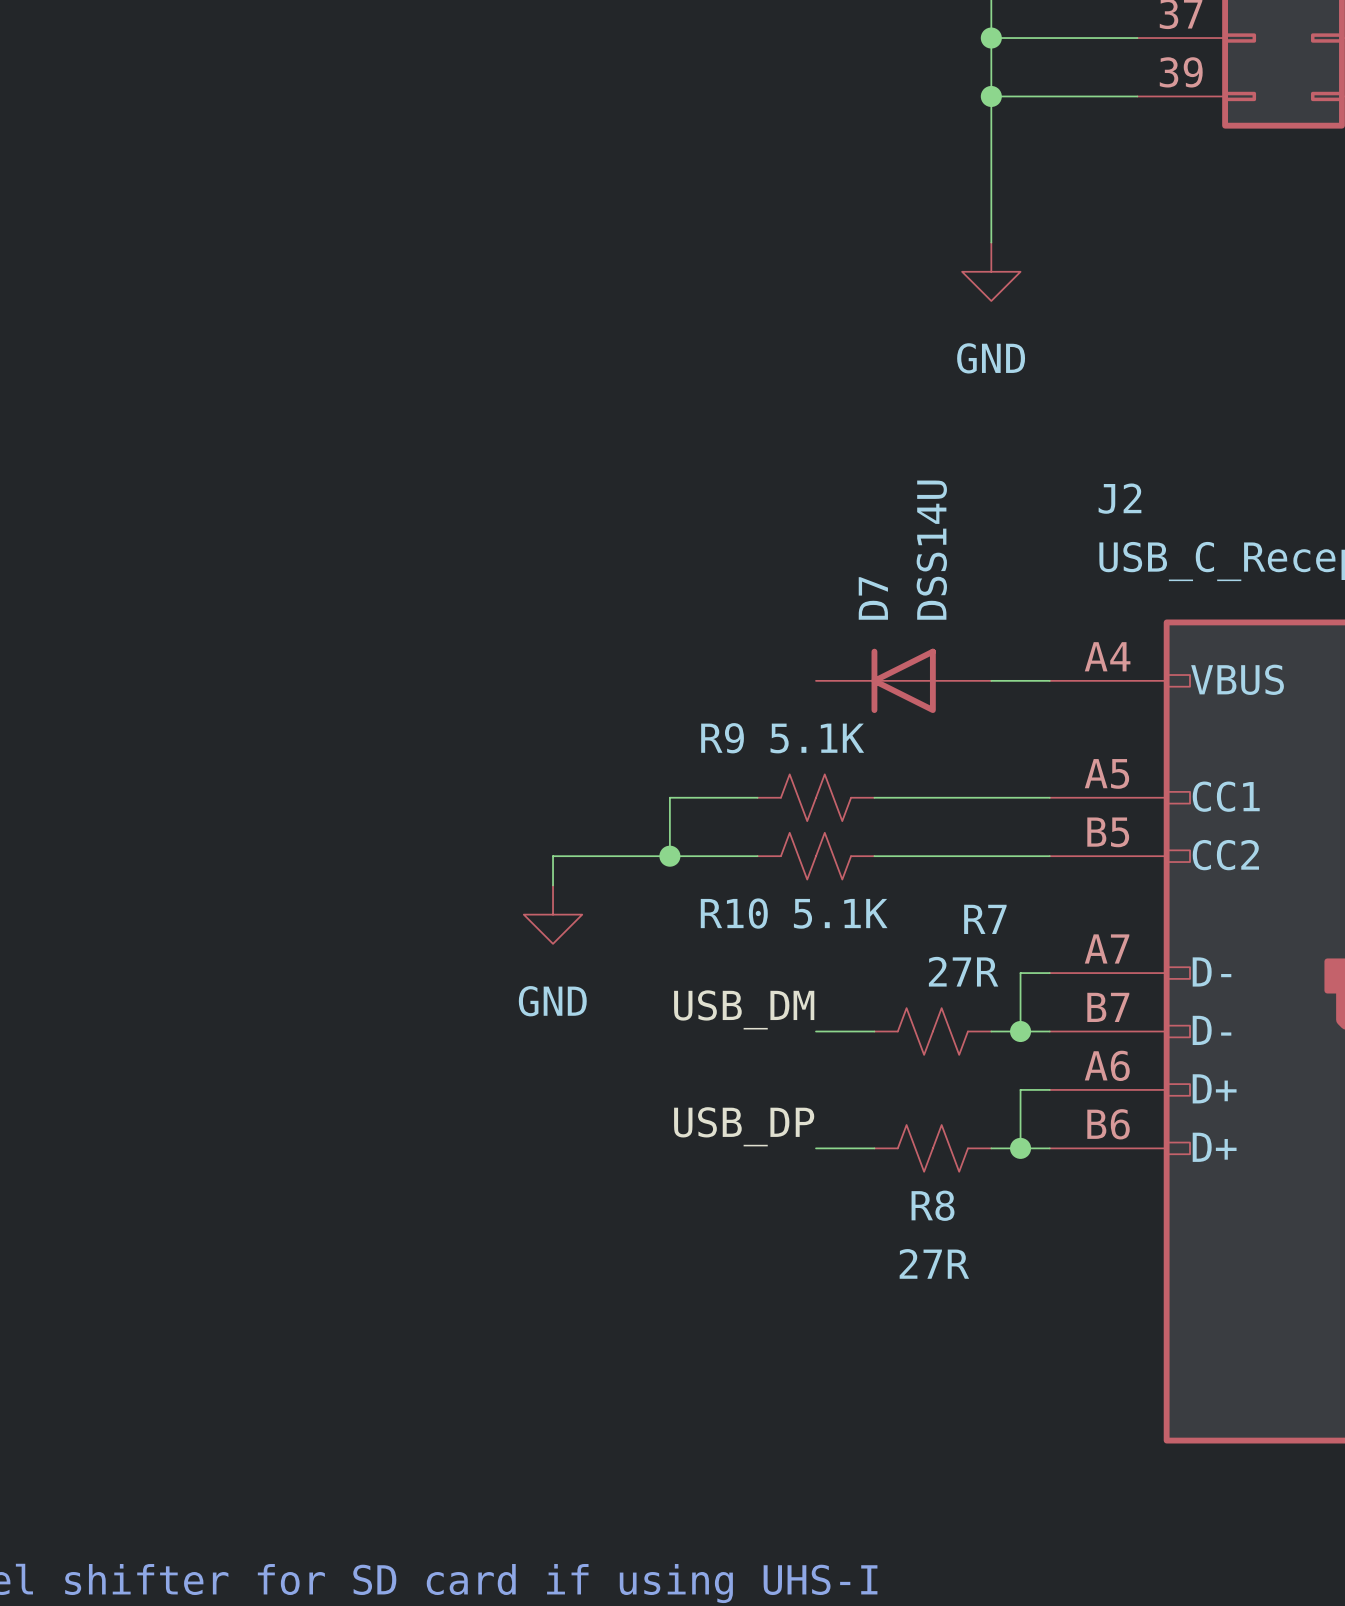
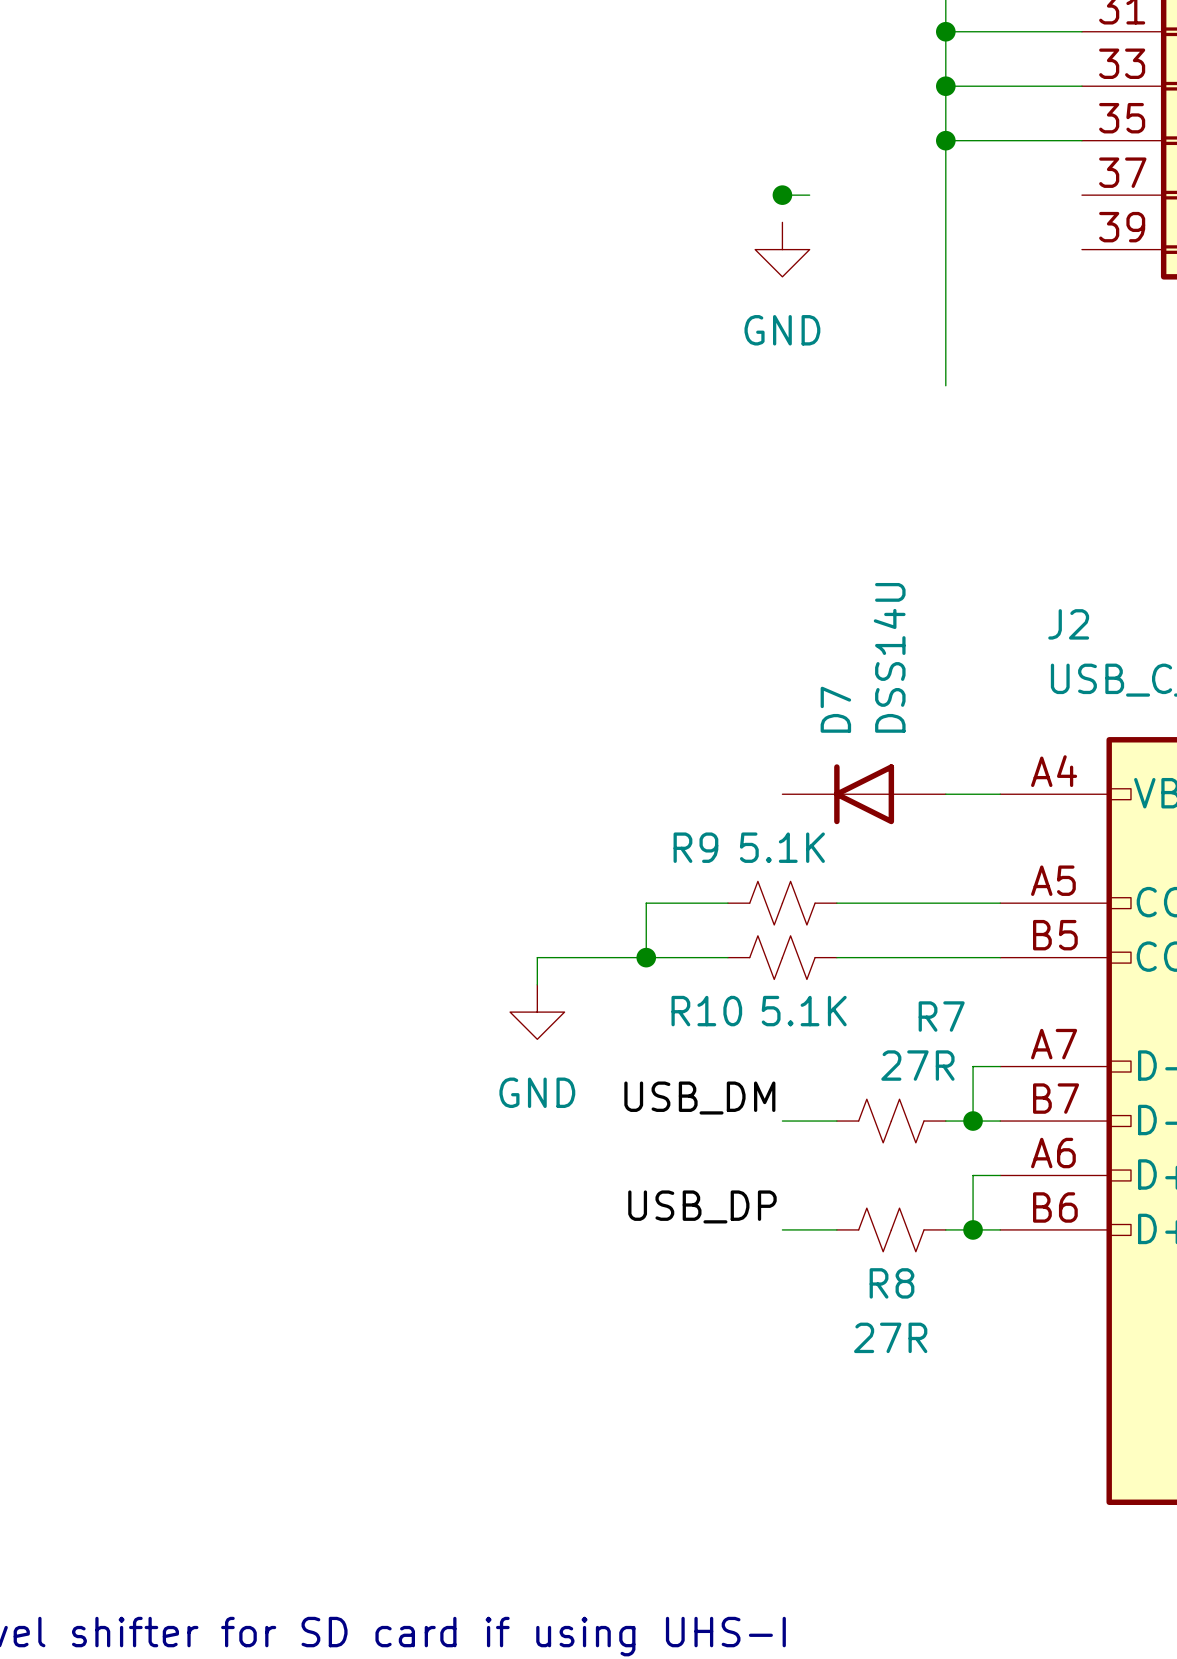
wire: none -> (782, 195) (809, 195)
junction: none -> (782, 195)
wire: (991, 38) (1137, 38) -> none
junction: (991, 38) -> none
wire: (991, 96) (1137, 96) -> none
junction: (991, 96) -> none
power symbol position: GND (991, 271) -> GND (782, 249)

